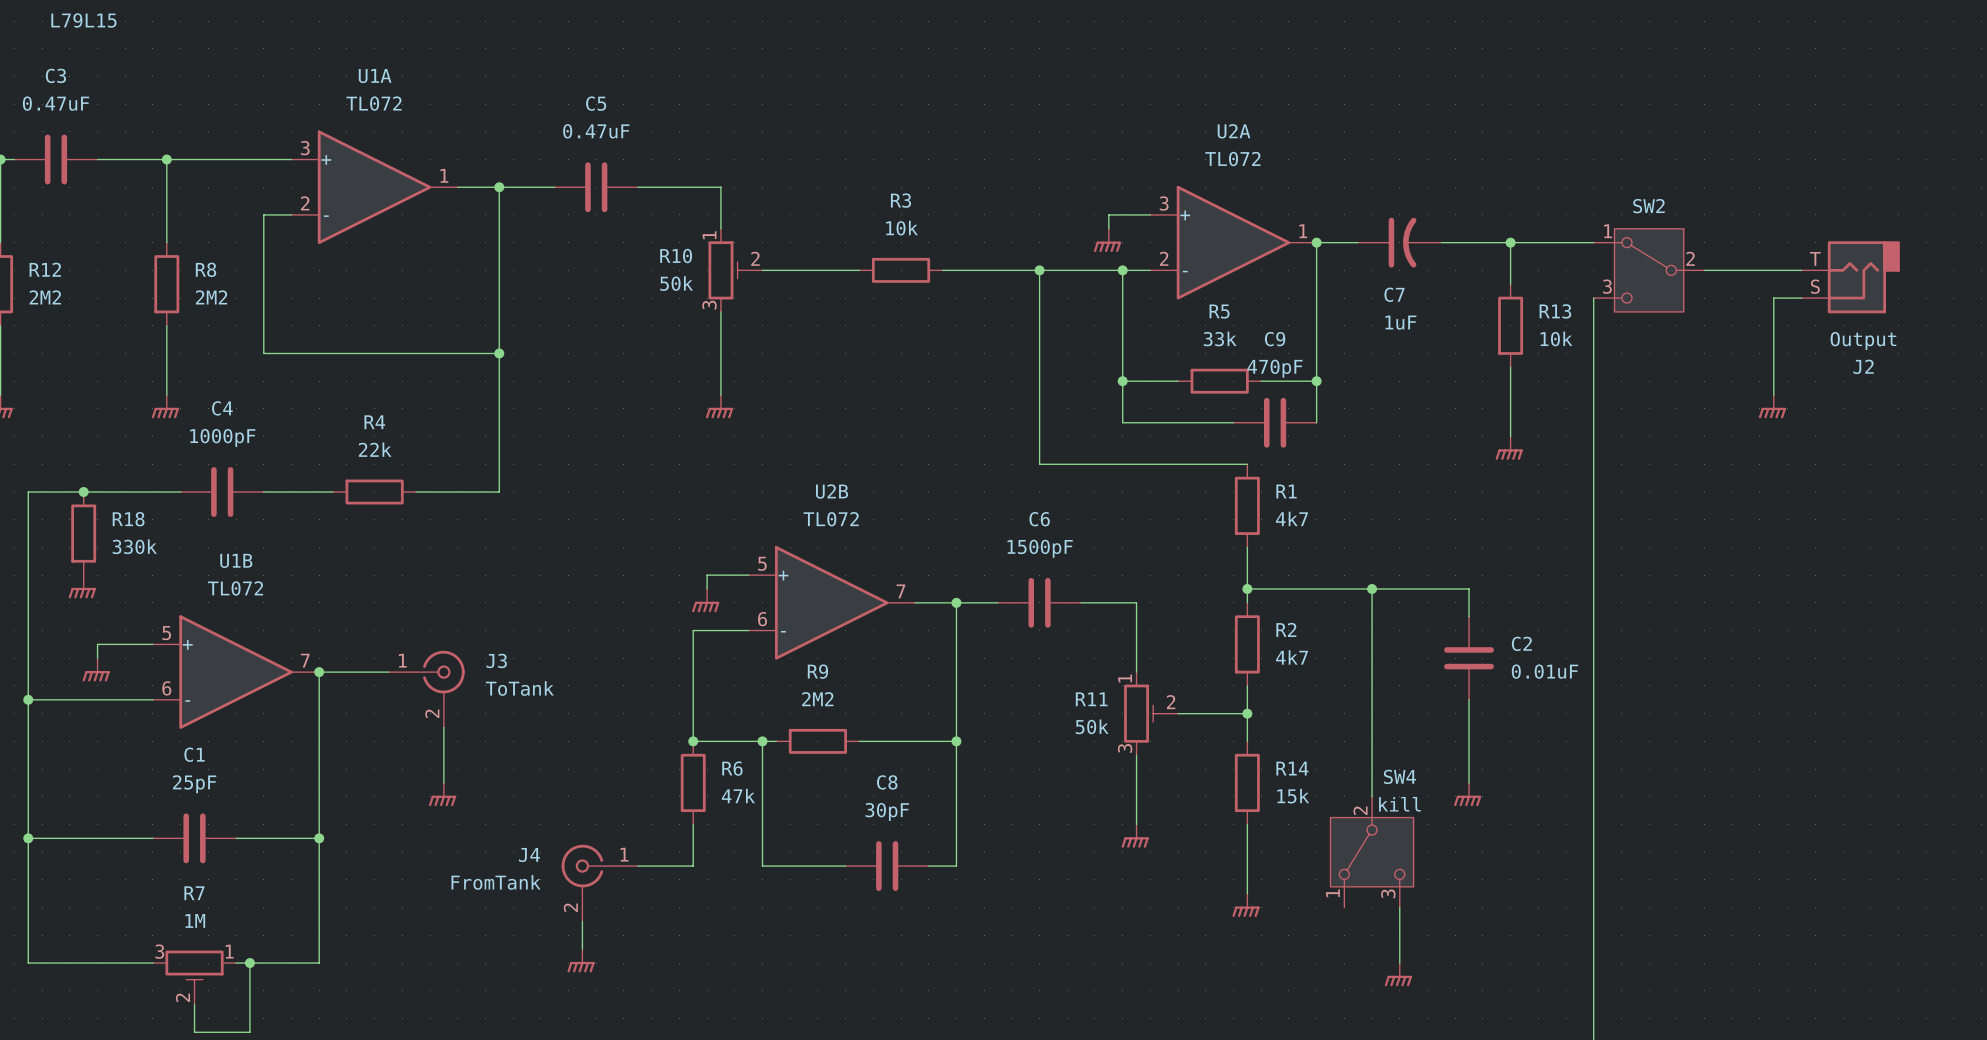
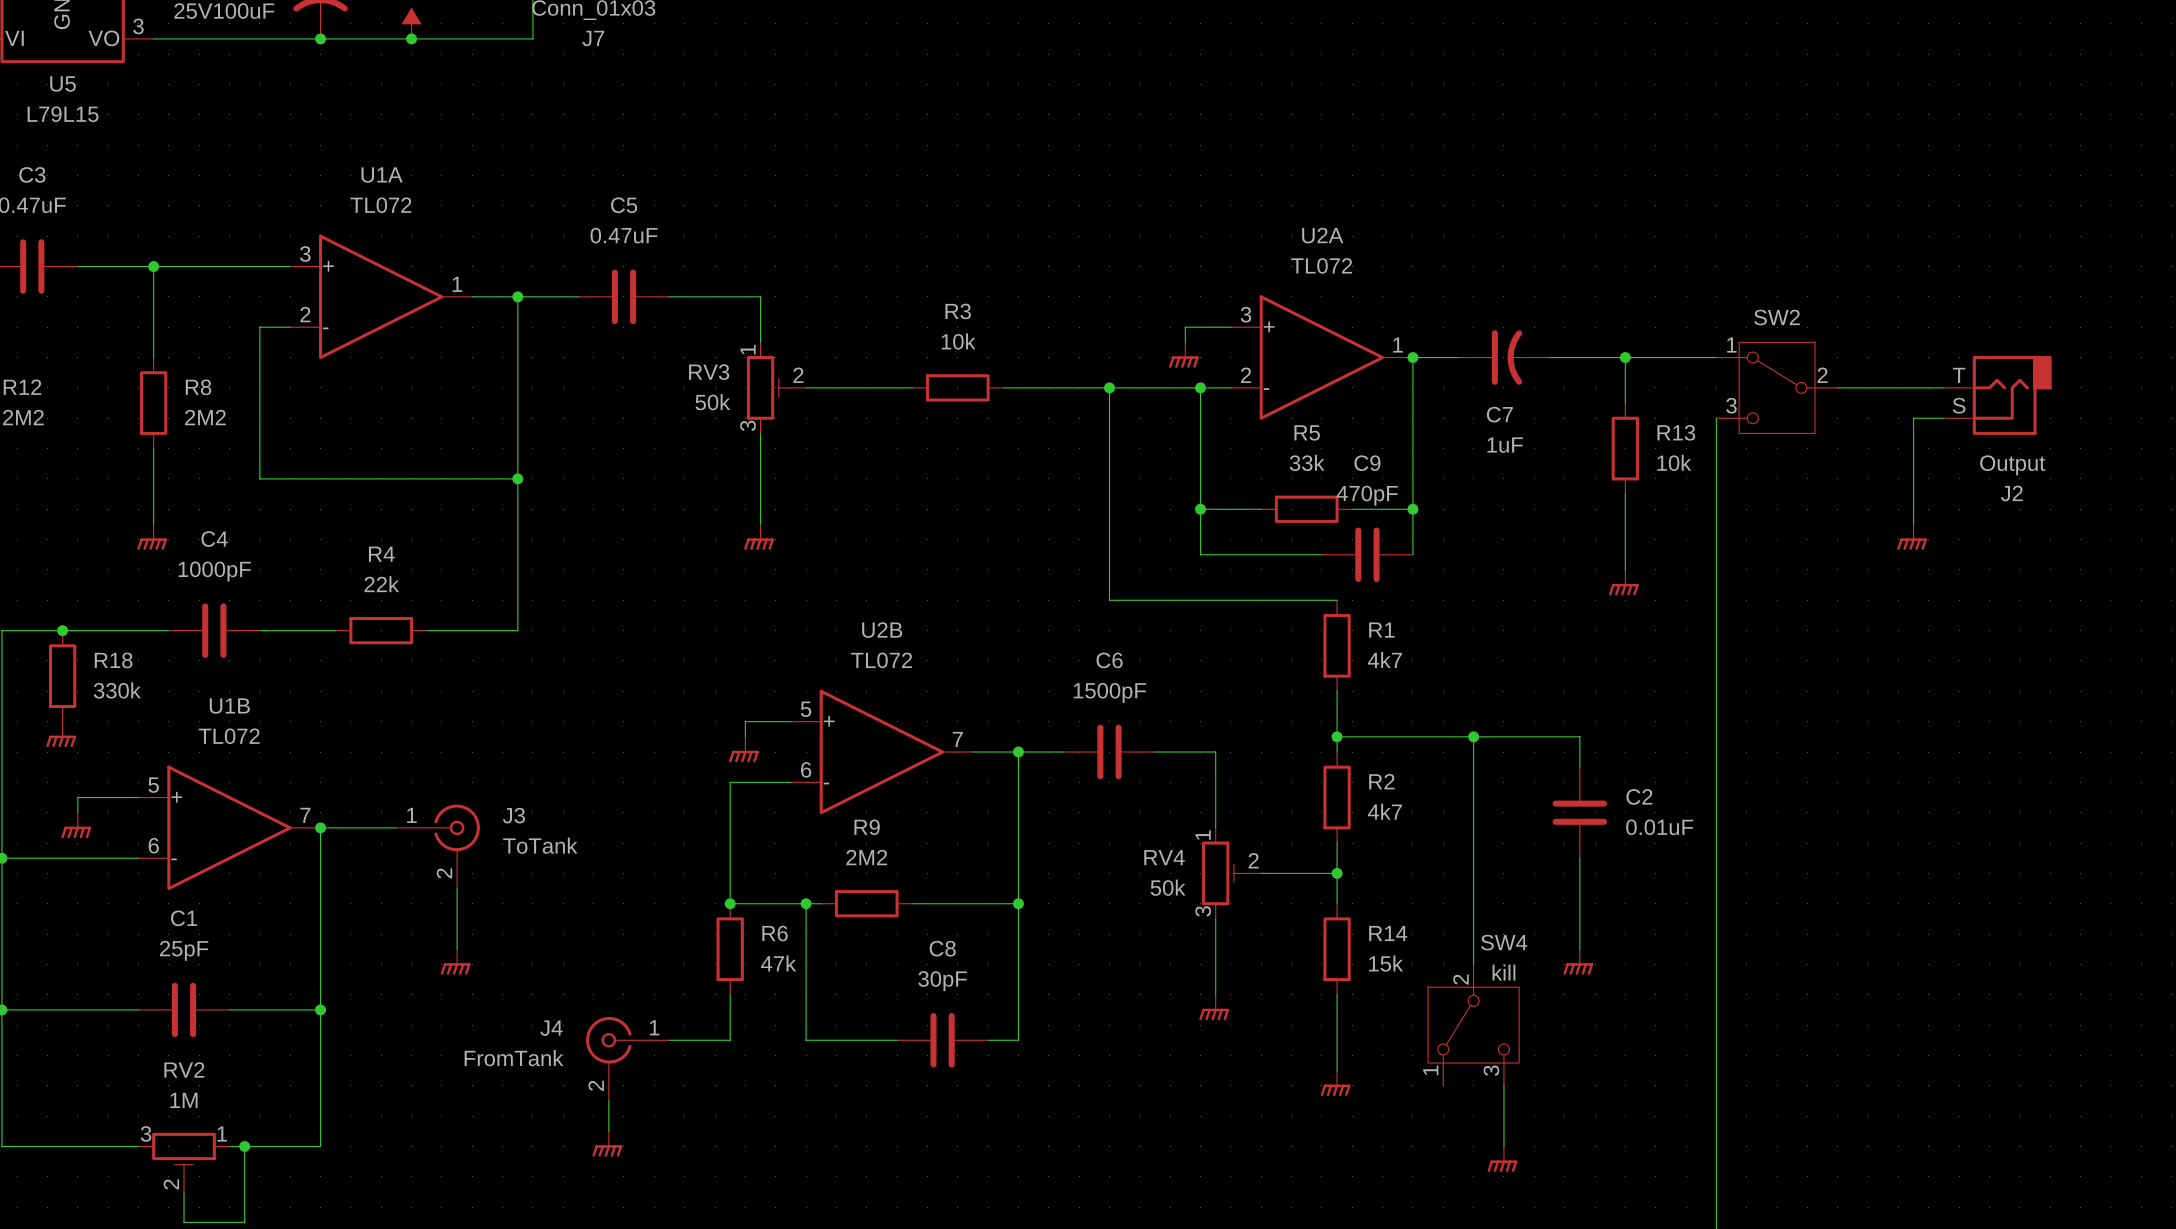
R10 name: R10 (676, 256) -> RV3 (709, 372)
R11 name: R11 (1091, 699) -> RV4 (1164, 857)
R7 name: R7 (194, 893) -> RV2 (184, 1069)

